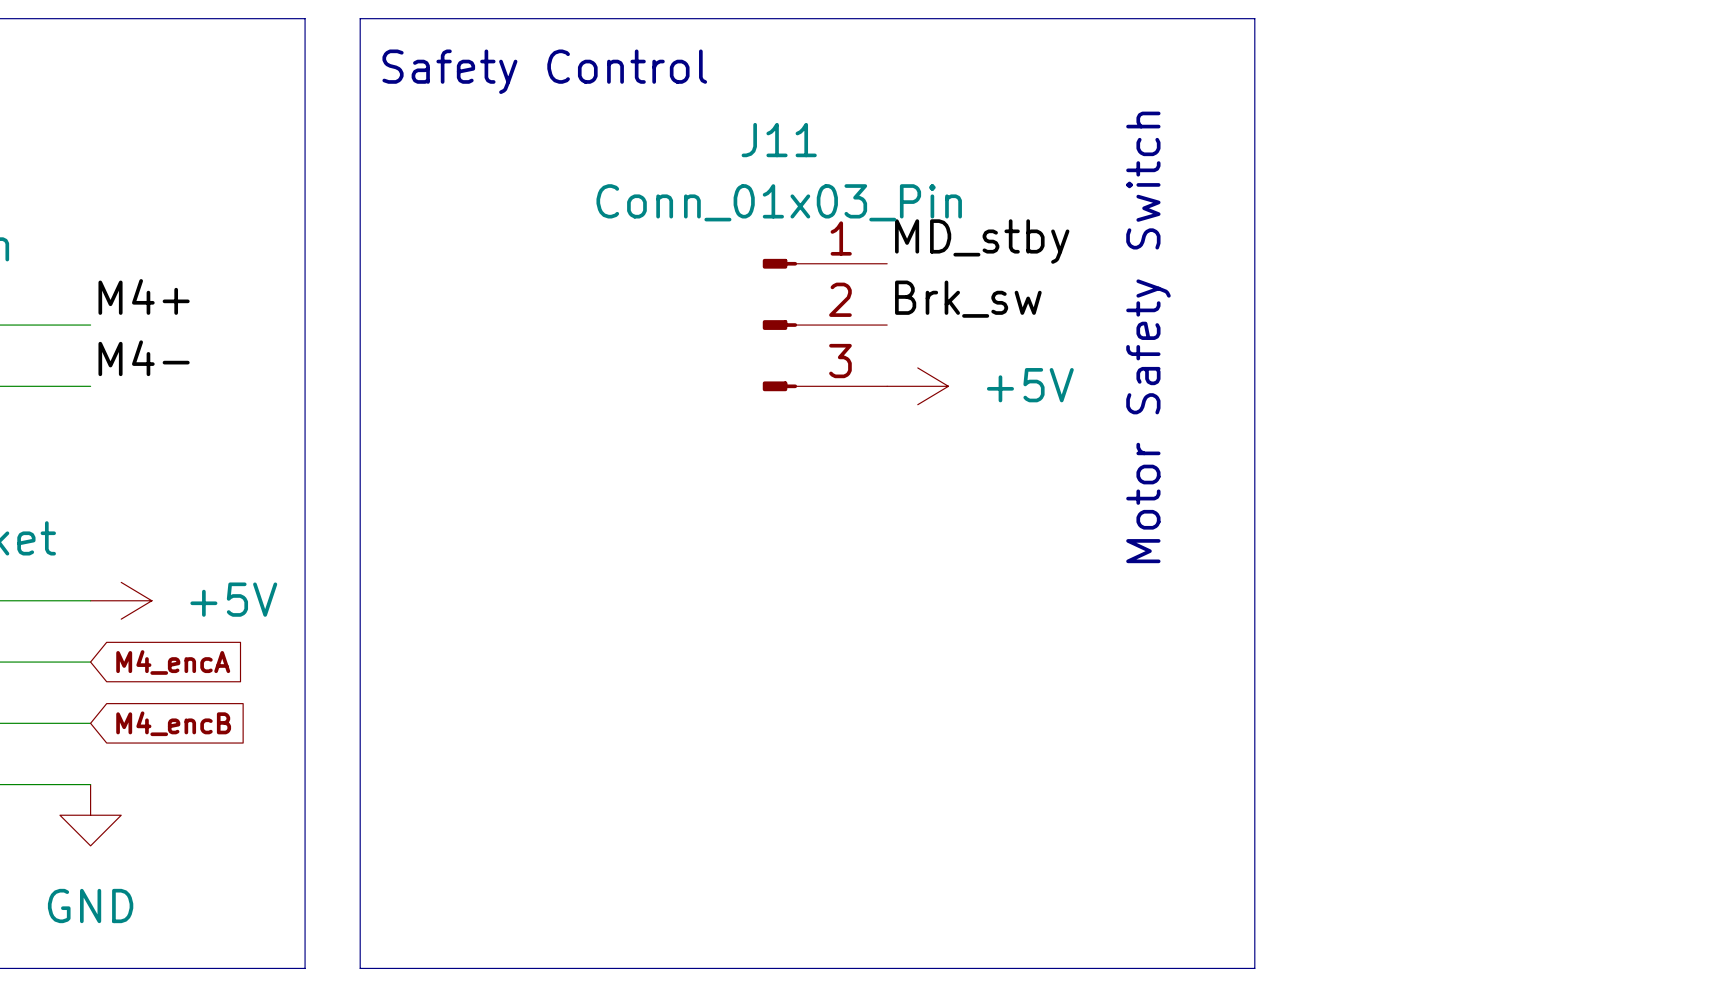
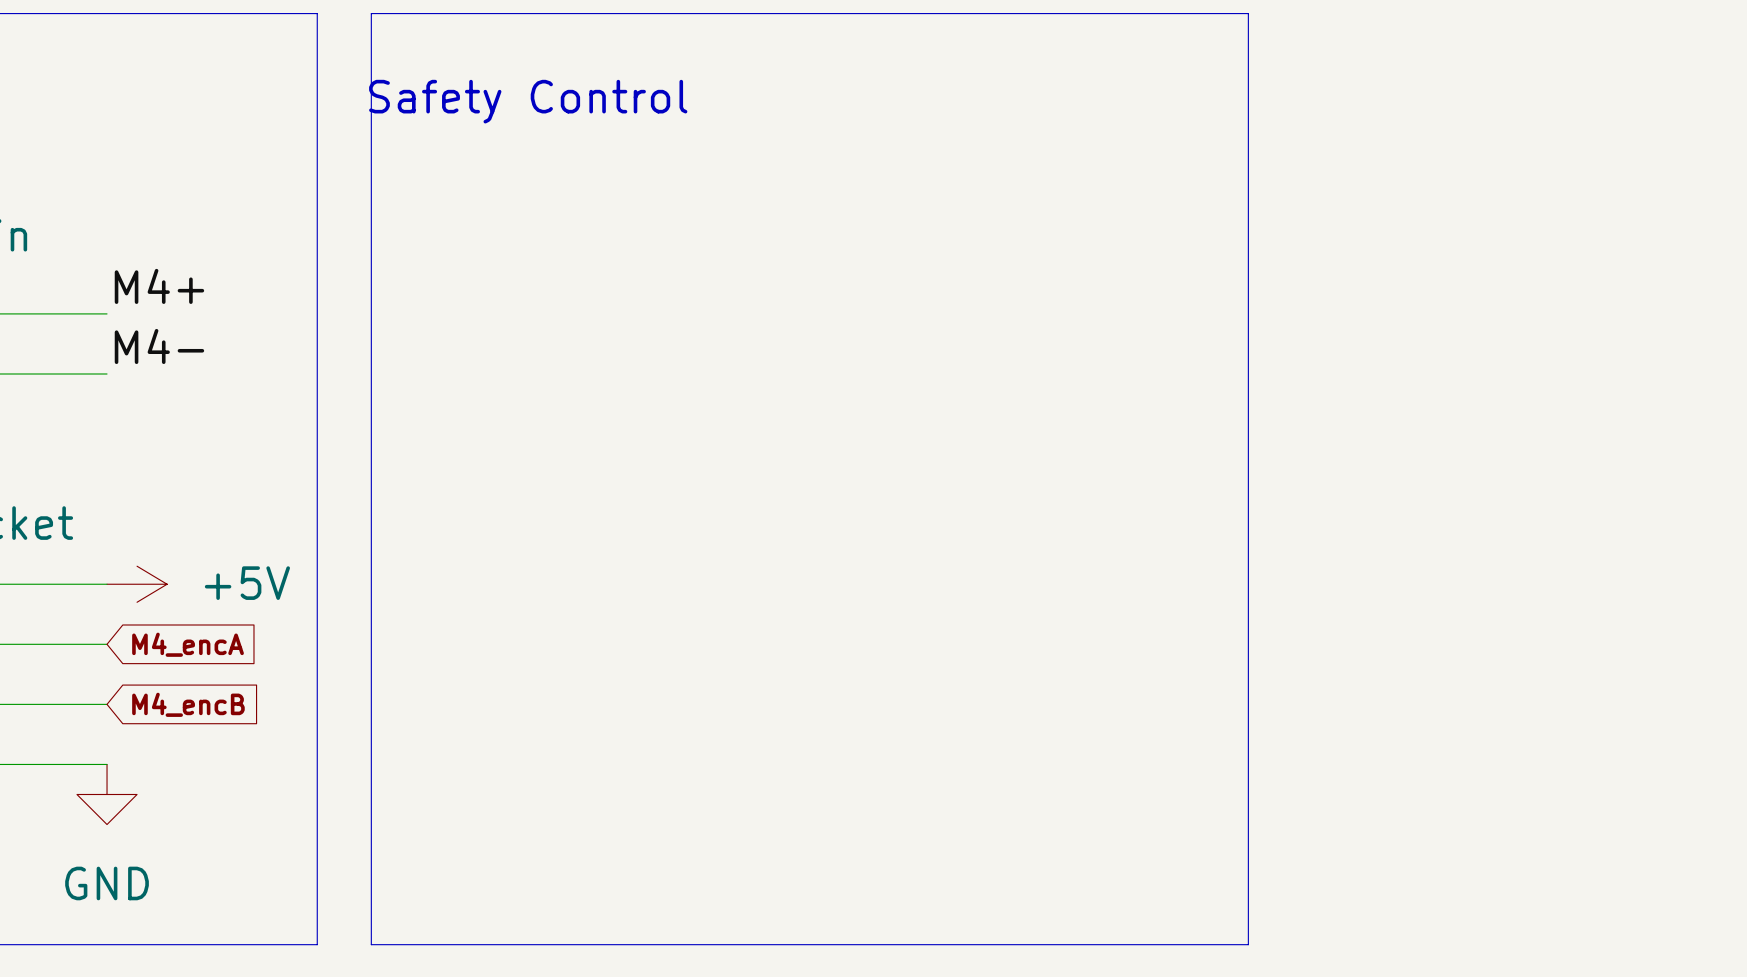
text position: Safety Control (544, 71) -> Safety Control (528, 101)
label: MD_stby (982, 241) -> none
label: Brk_sw (968, 299) -> none
J11: Conn_01x03_Pin (824, 325) -> none
text: Motor Safety Switch (1148, 337) -> none
power symbol: +5V (917, 386) -> none

